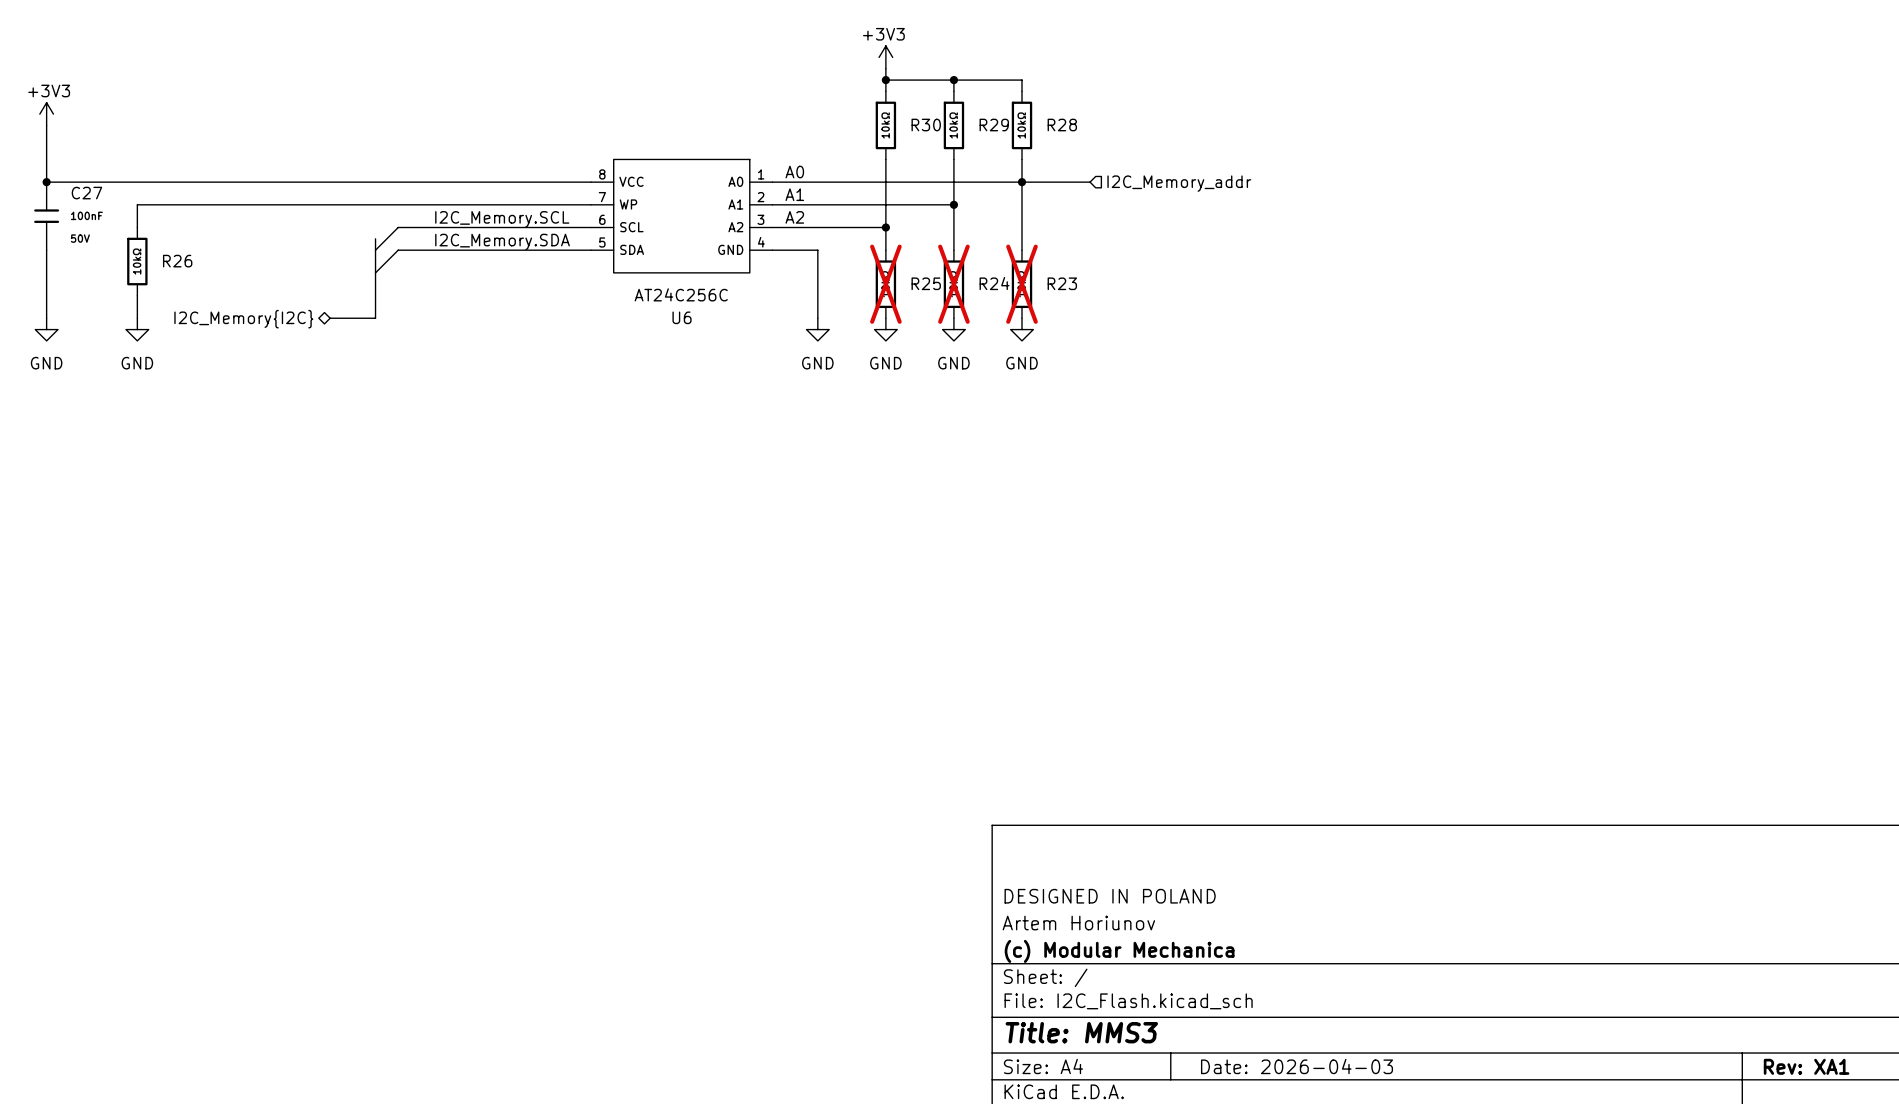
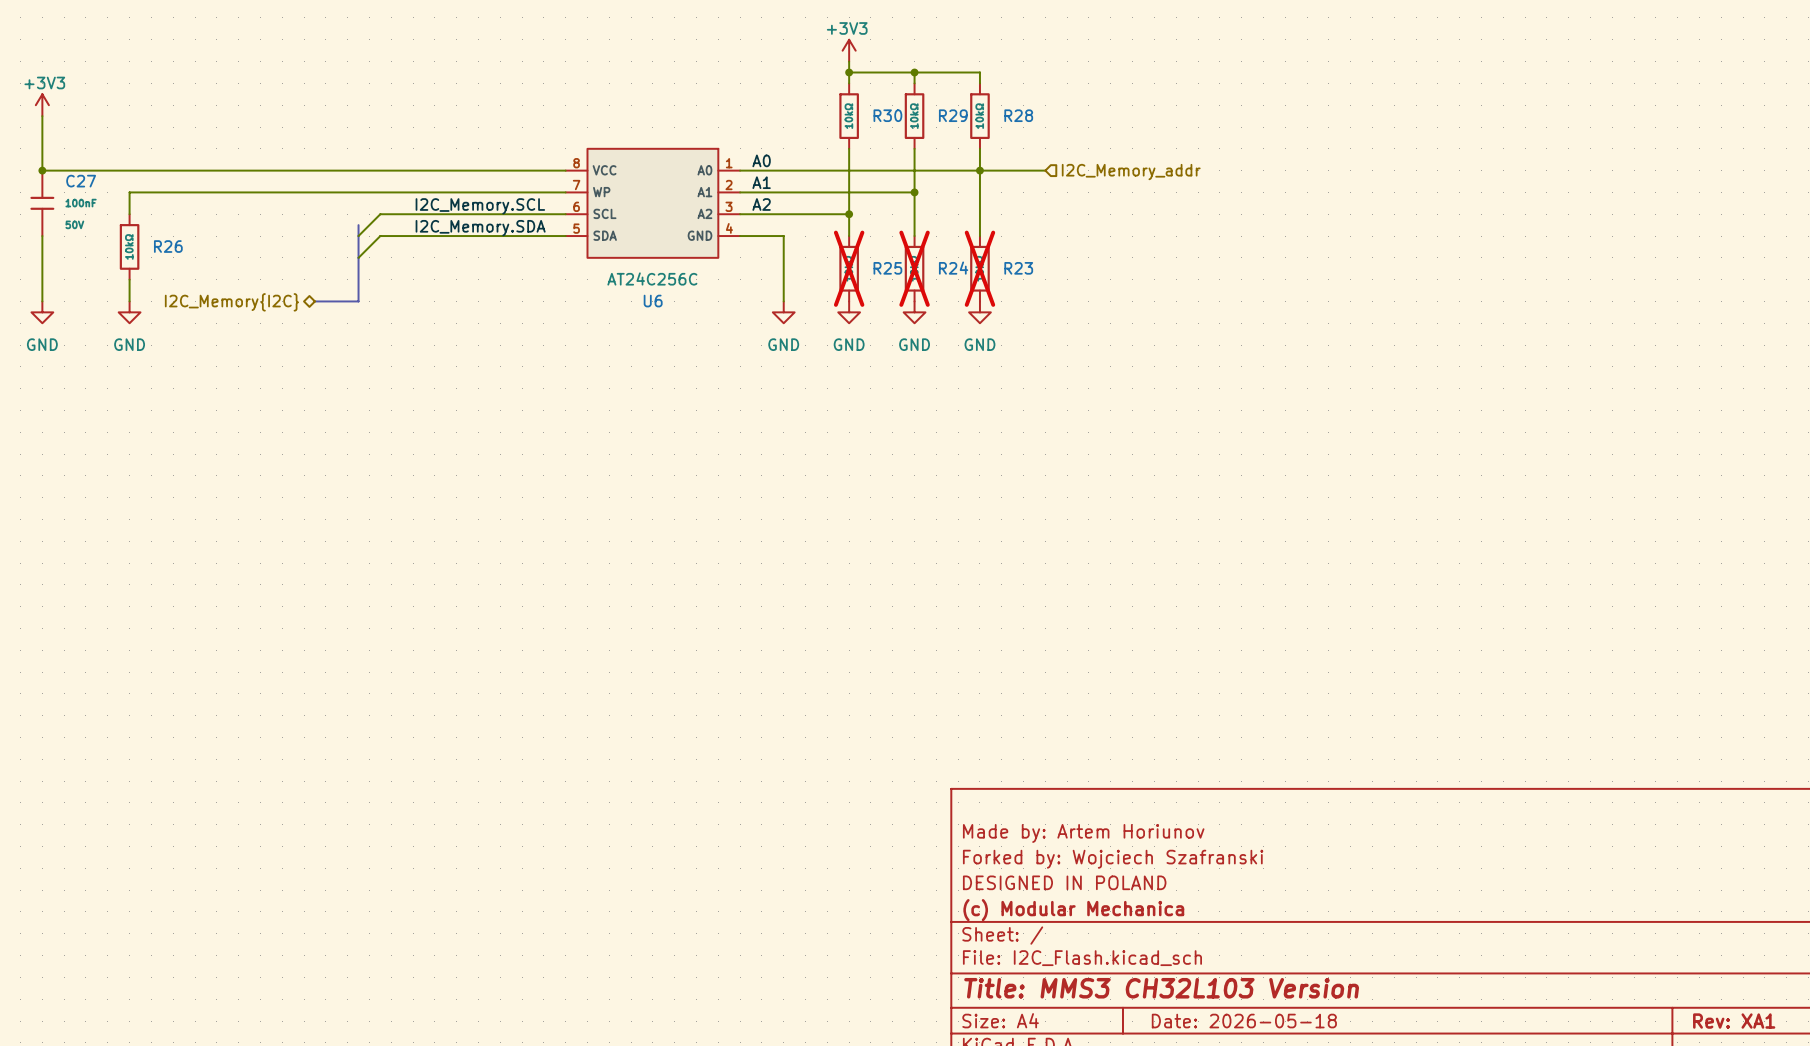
title block: none -> Made by: Artem Horiunov (1083, 833)
title block: DESIGNED IN POLAND (1110, 896) -> Forked by: Wojciech Szafranski (1113, 859)
title block: Artem Horiunov (1078, 923) -> DESIGNED IN POLAND (1064, 882)
title block: Title: MMS3 (1081, 1032) -> Title: MMS3 CH32L103 Version (1161, 988)
title block: Date: 2026-04-03 (1297, 1066) -> Date: 2026-05-18 (1244, 1021)

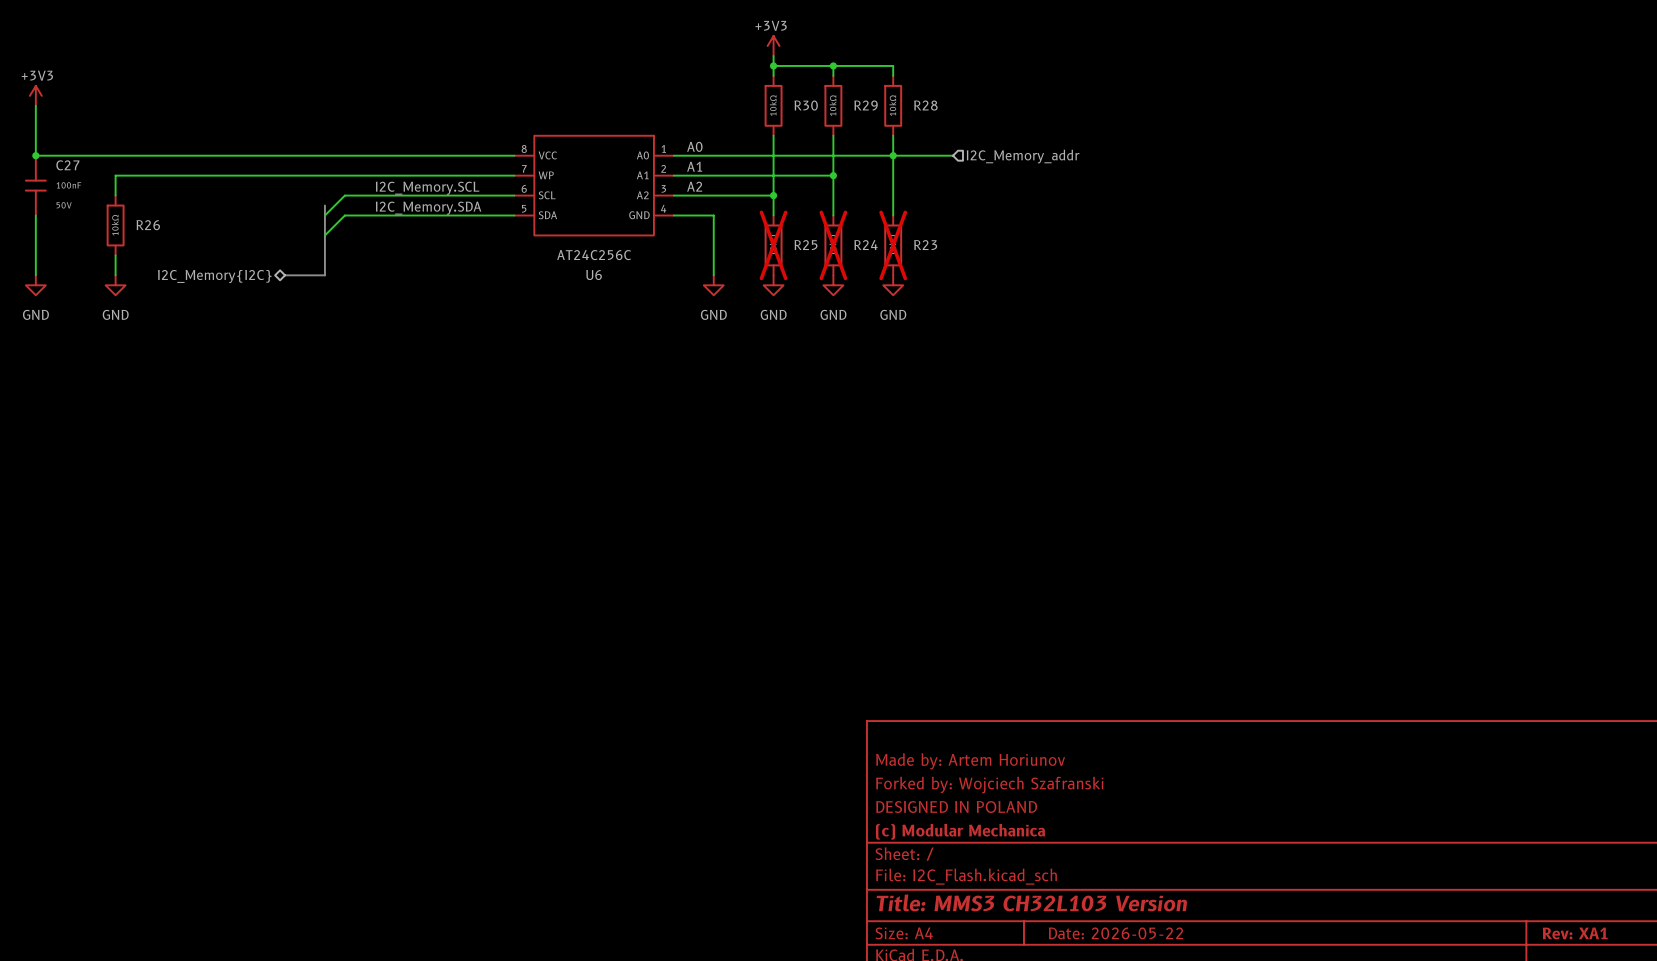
title block: Date: 2026-05-18 (1244, 1021) -> Date: 2026-05-22 (1115, 933)

